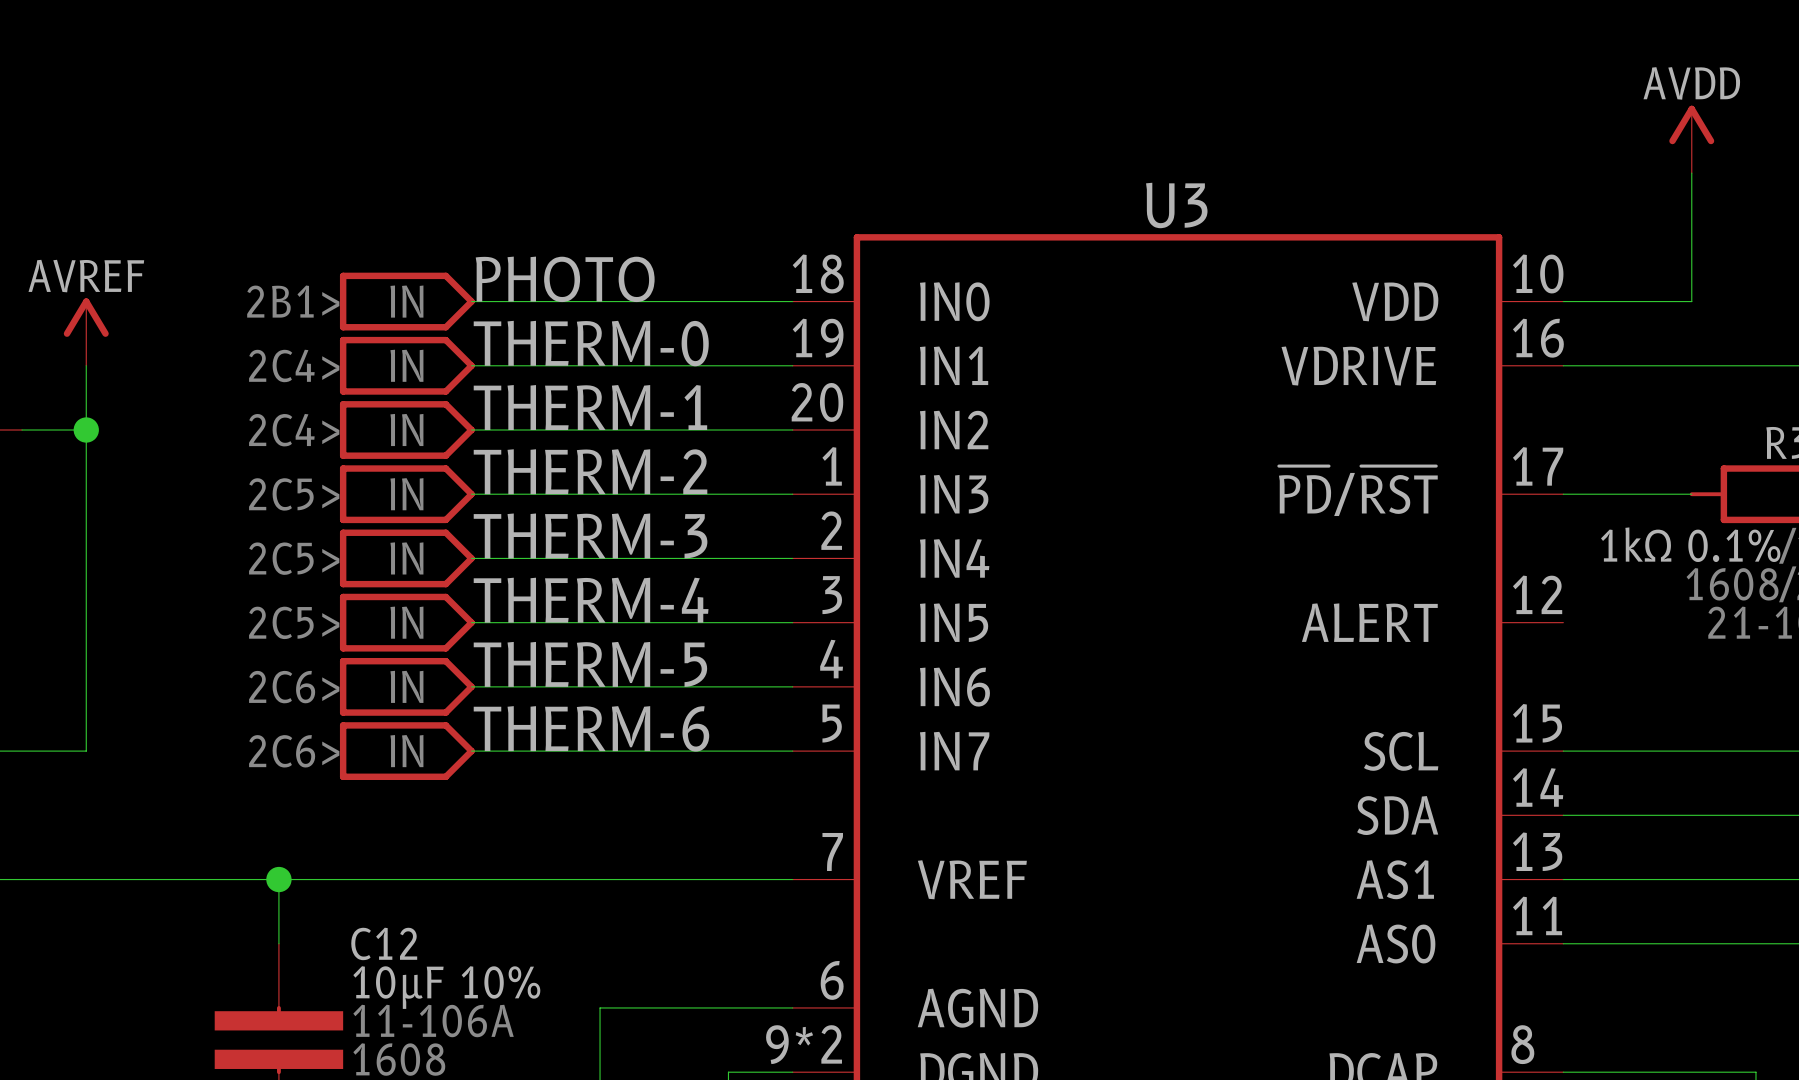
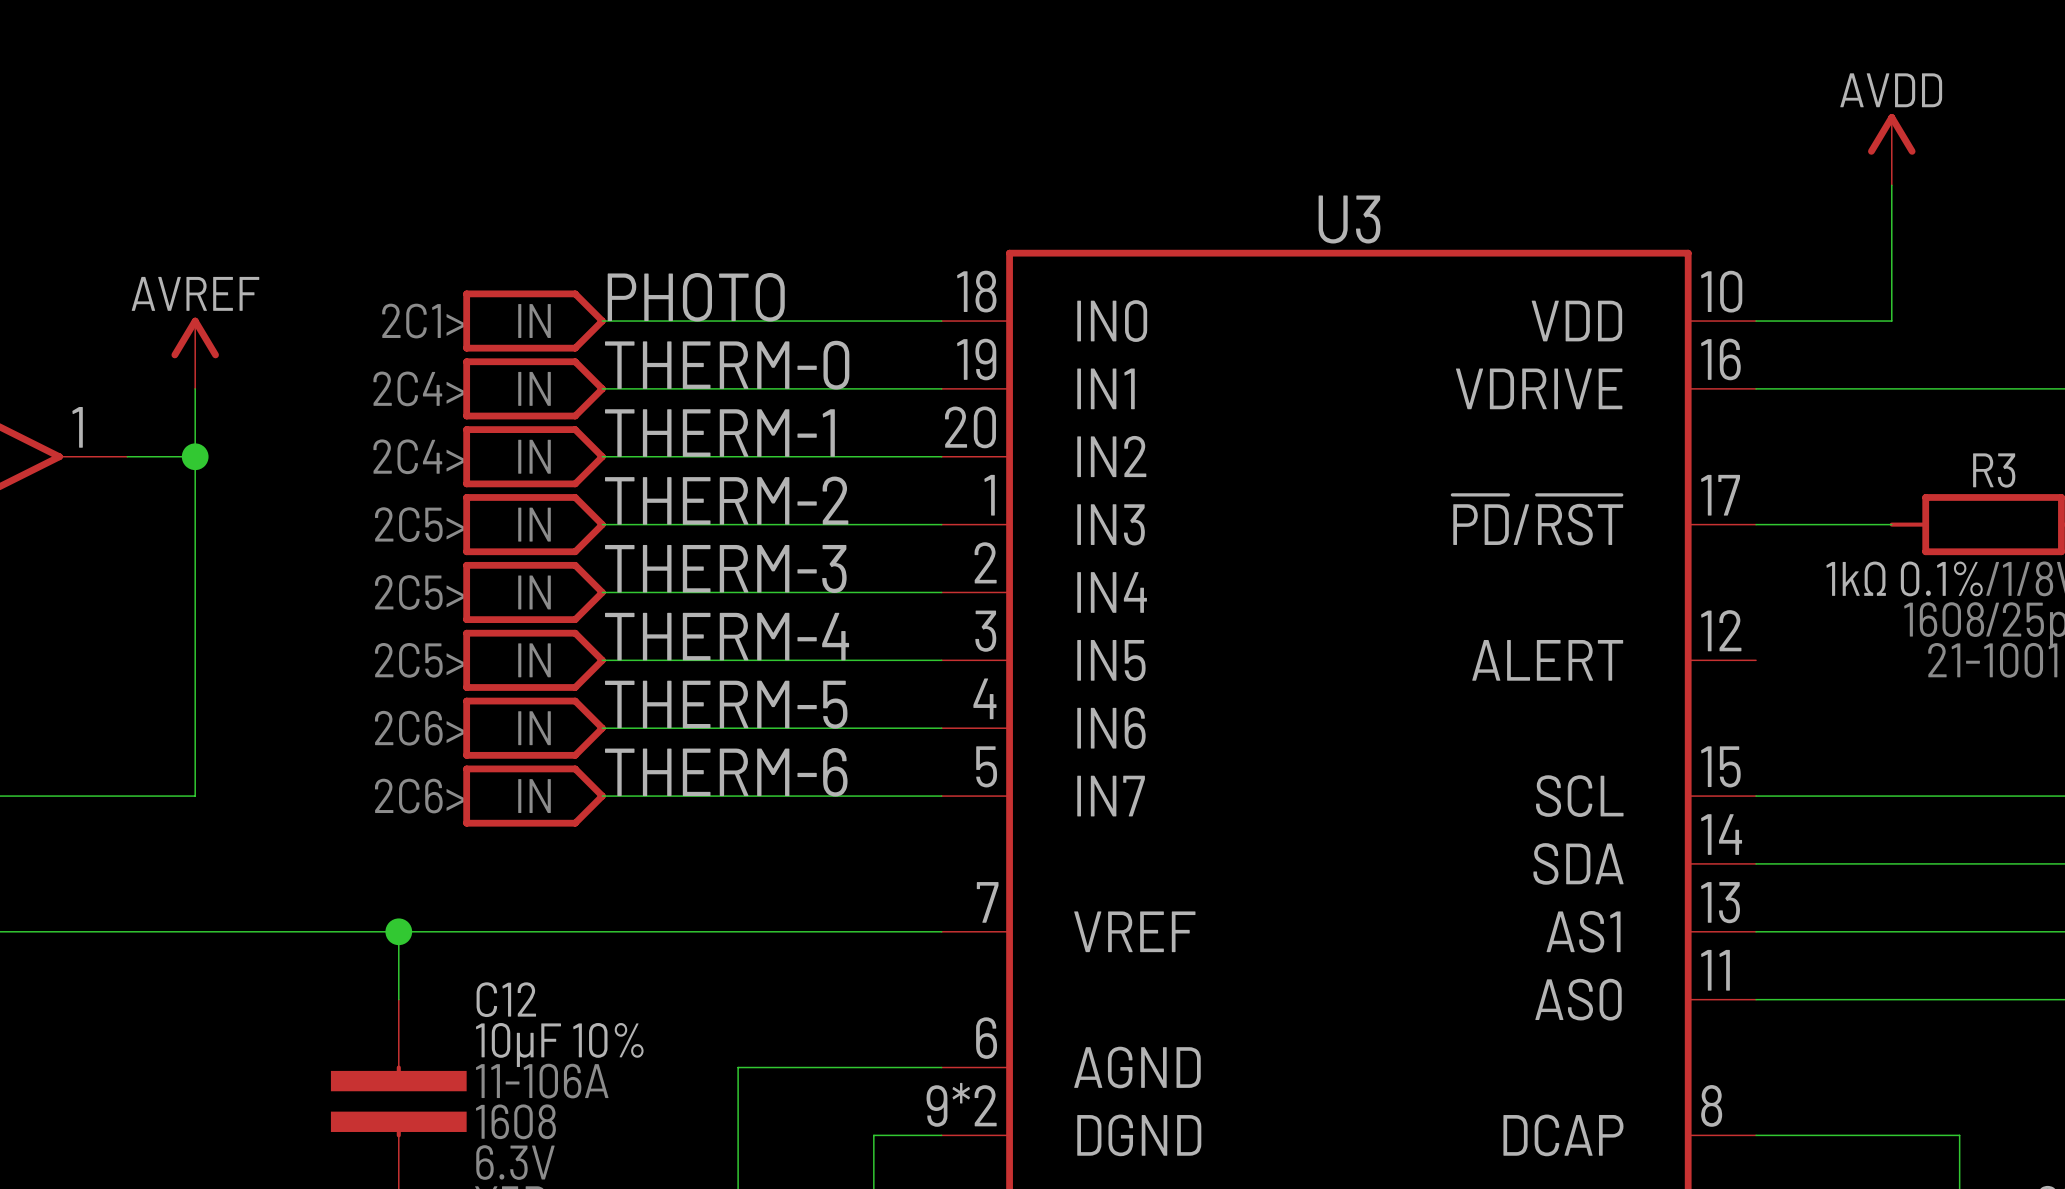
text: 2B1> (293, 301) -> 2C1> (423, 321)

